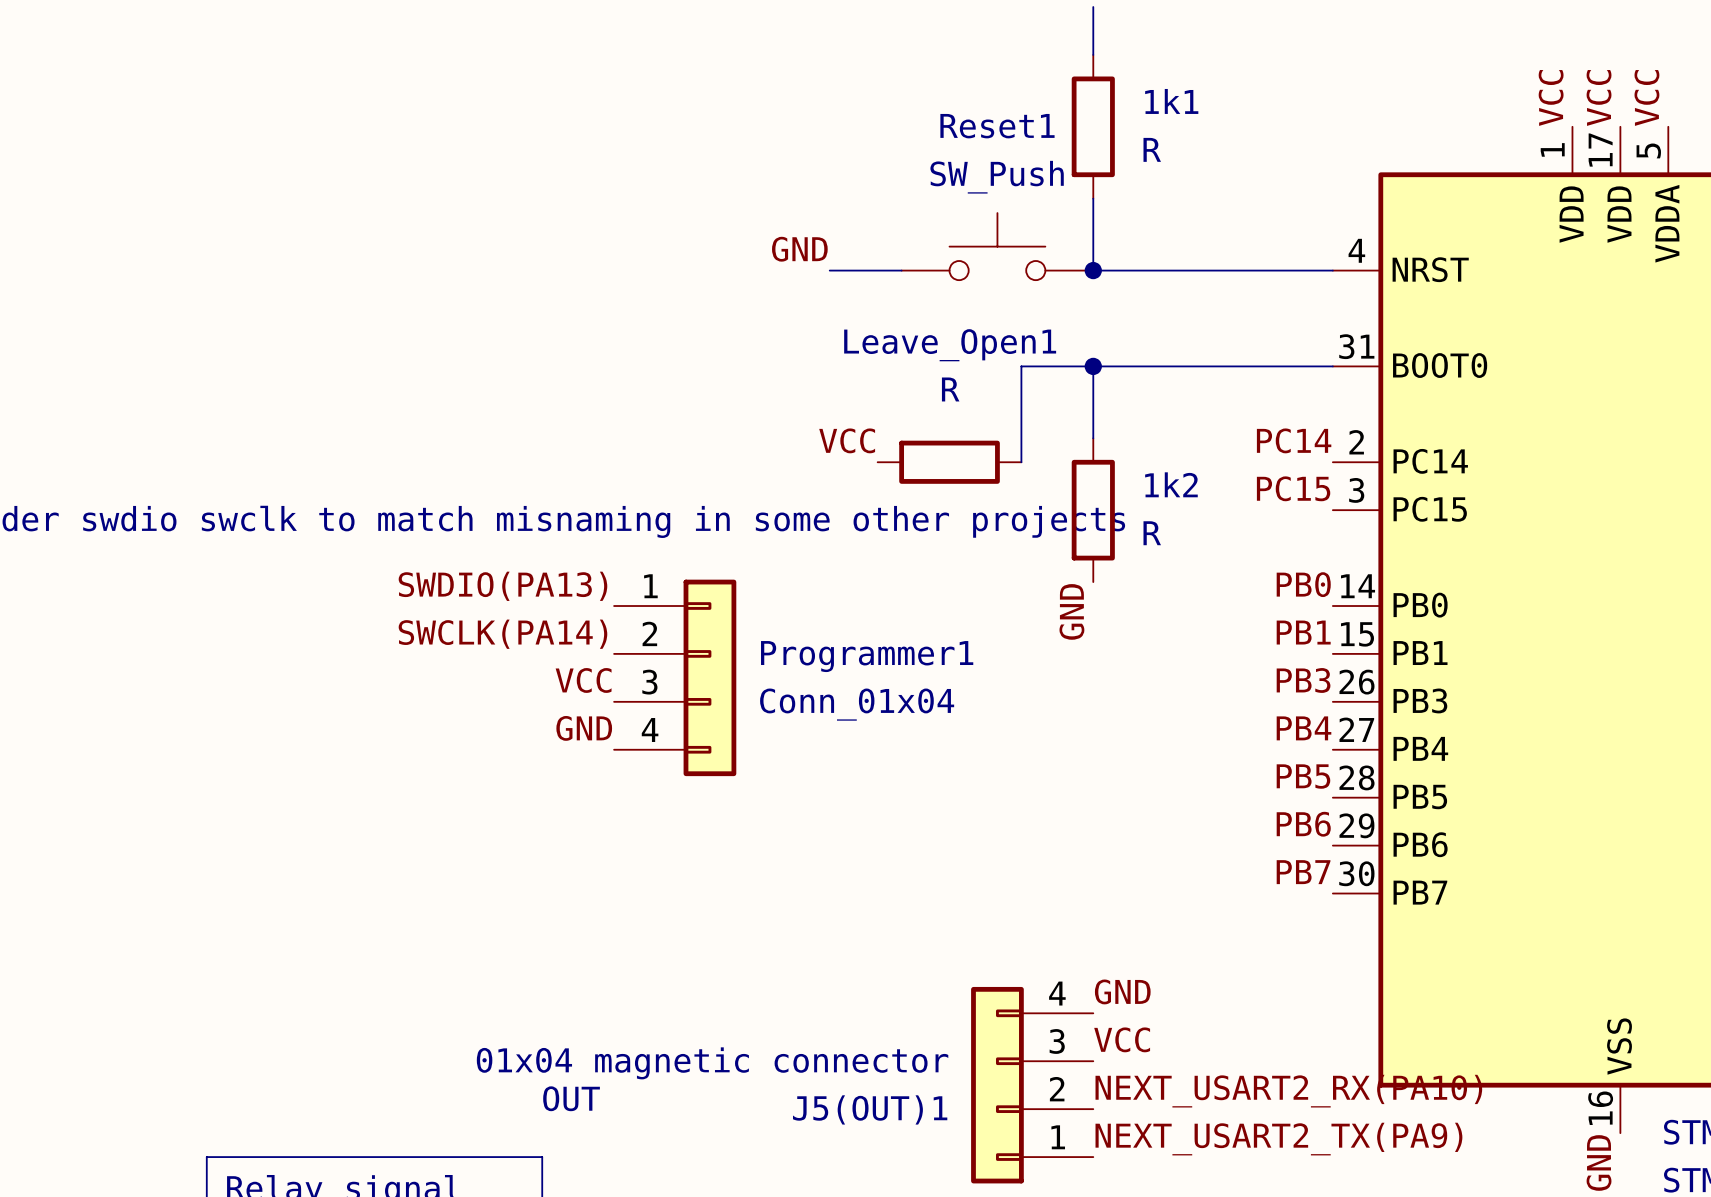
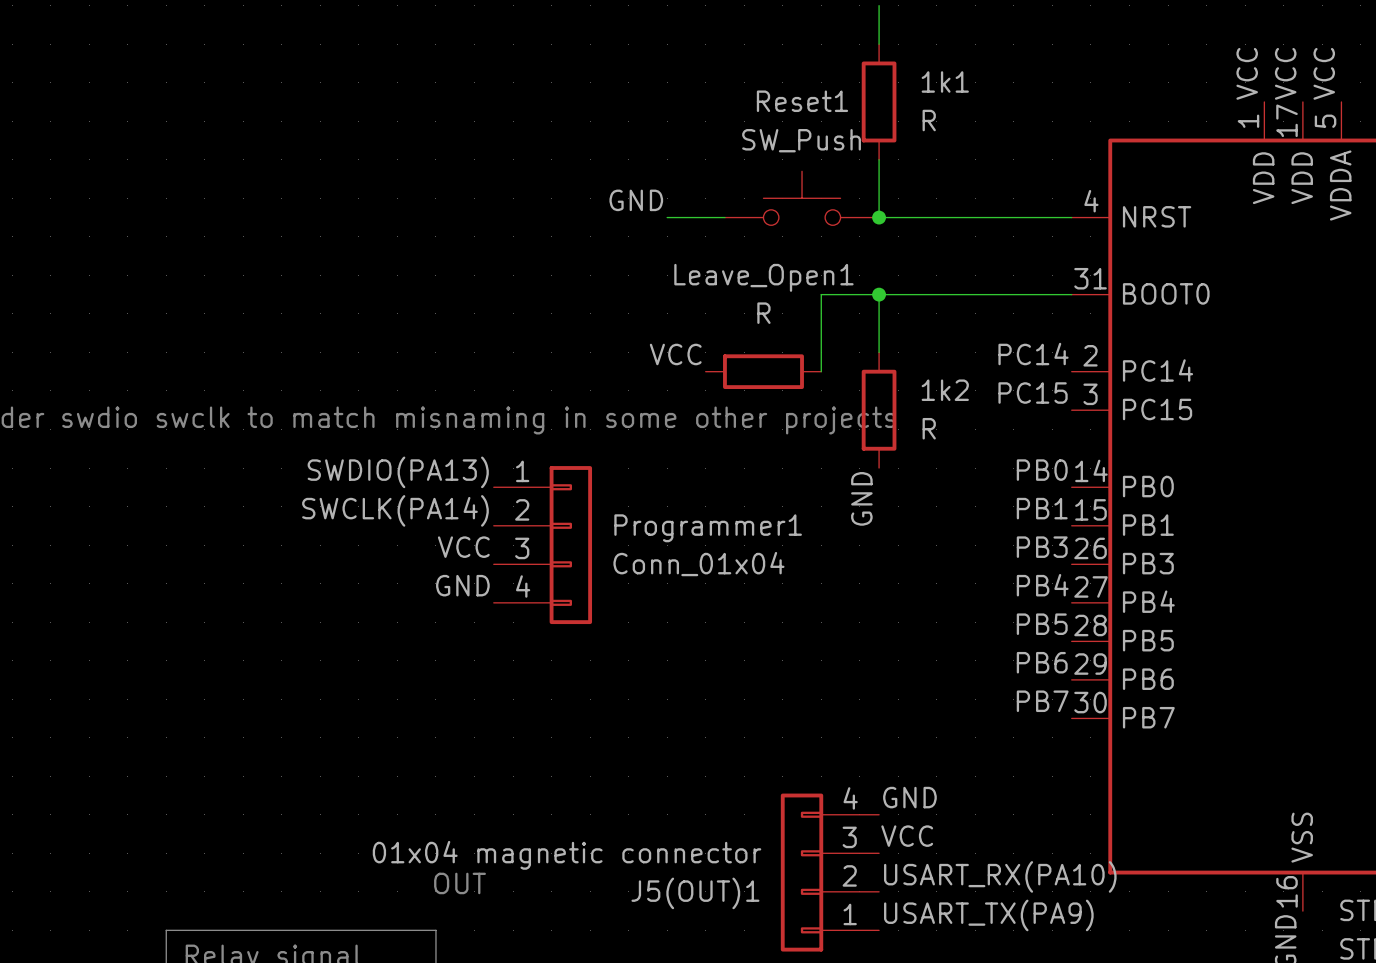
label: NEXT_USART2_RX(PA10) (1288, 1091) -> USART_RX(PA10) (1000, 876)
label: NEXT_USART2_TX(PA9) (1278, 1139) -> USART_TX(PA9) (988, 915)

